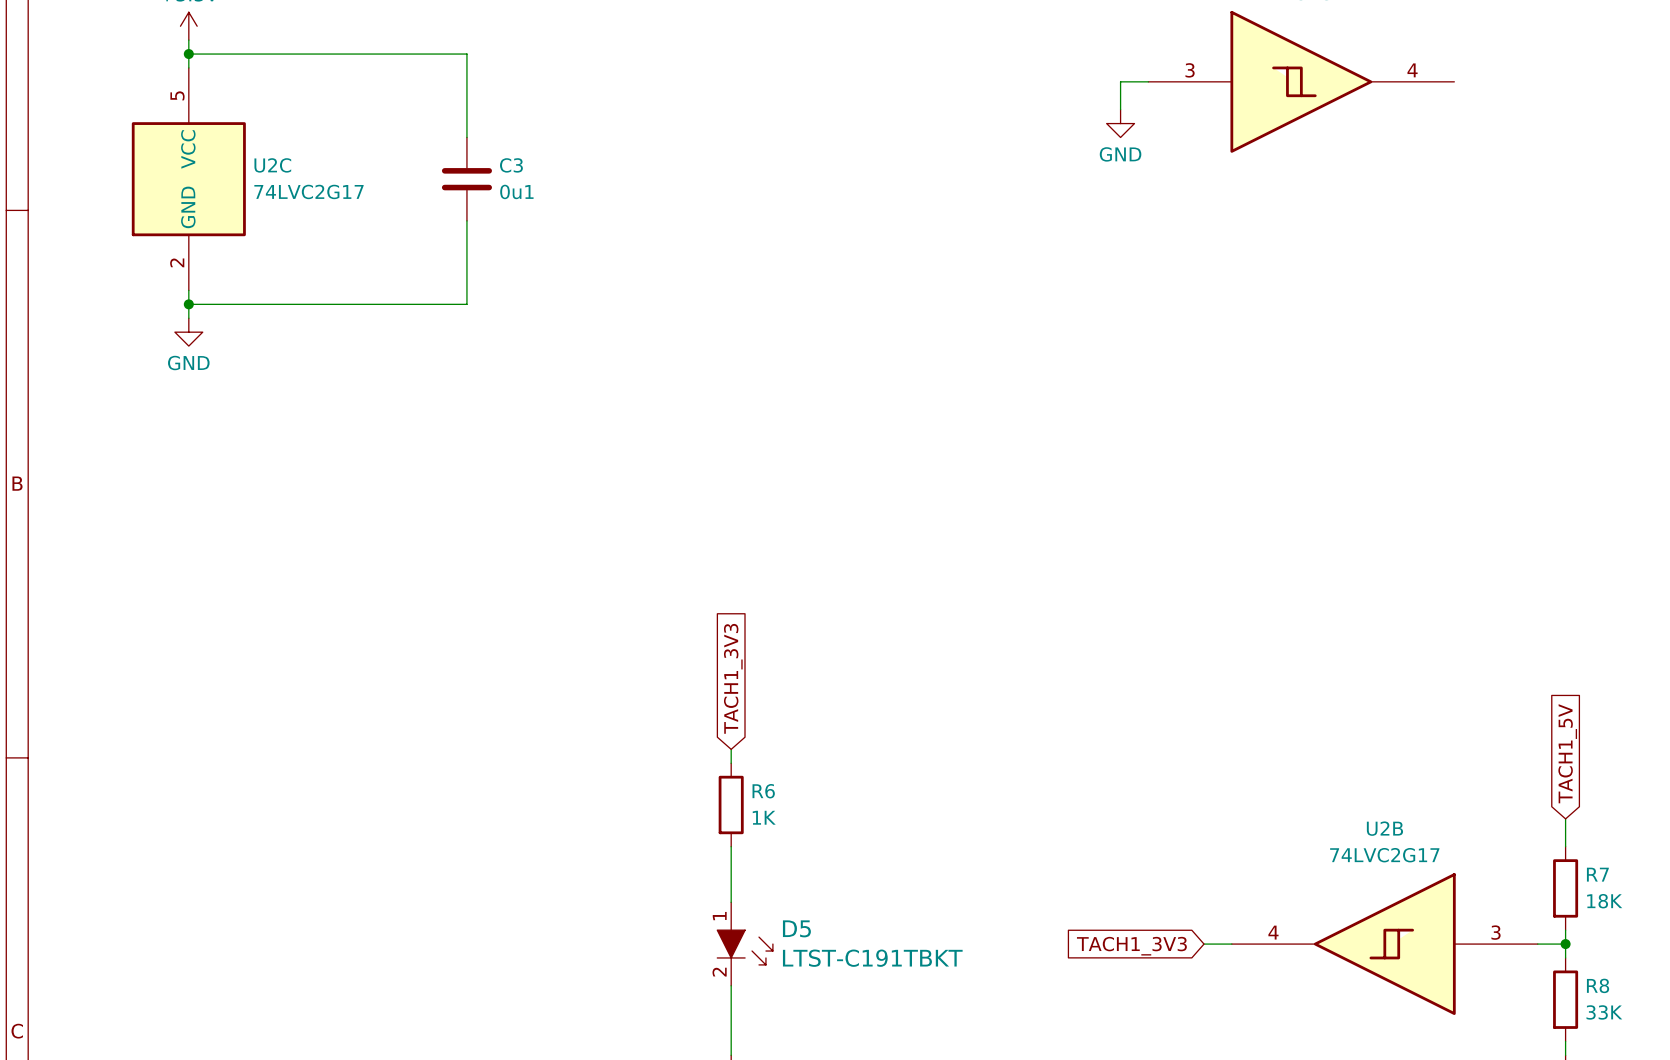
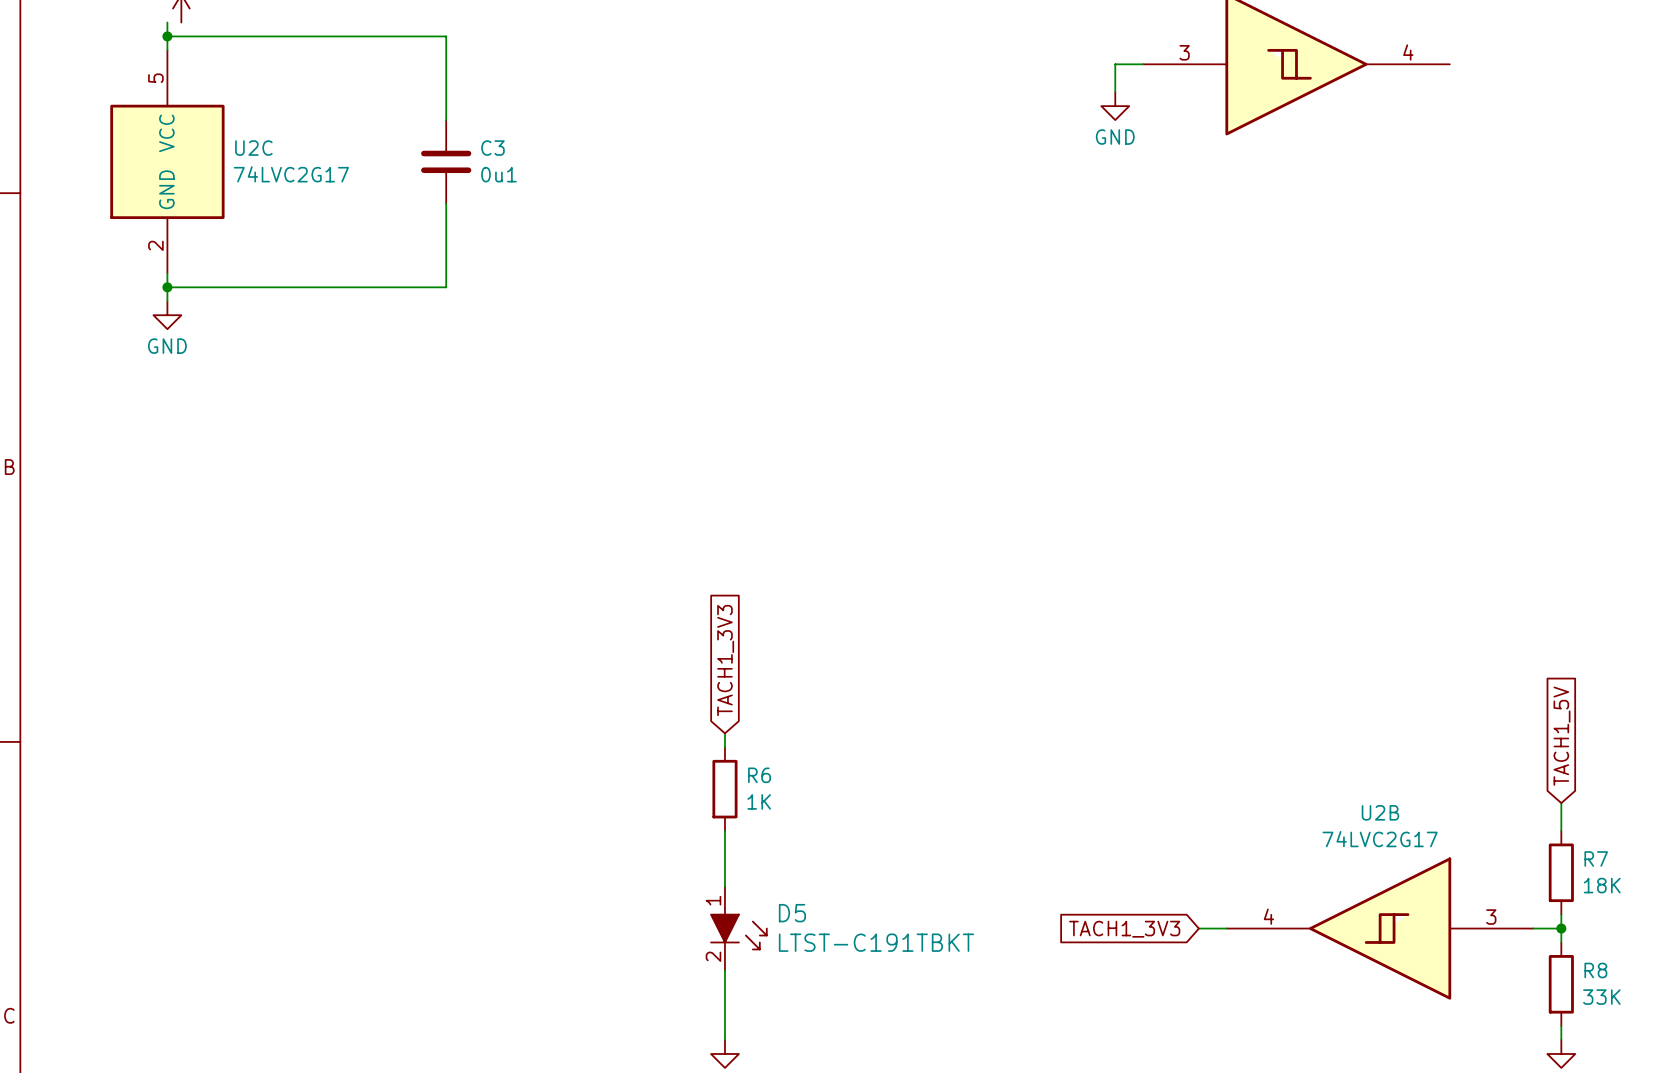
wire: (188, 40) (188, 67) -> (167, 22) (167, 50)
wire: none -> (167, 36) (181, 36)
junction position: (188, 54) -> (167, 36)
wire: (453, 54) (466, 54) (466, 137) -> (446, 36) (446, 120)
U2C position: (188, 179) -> (167, 161)
C3 position: (466, 179) -> (446, 161)
wire: (466, 220) (466, 304) (453, 304) -> (446, 203) (446, 287)
wire: (188, 290) (188, 318) -> (167, 273) (167, 301)
wire: none -> (167, 287) (181, 287)
junction position: (188, 304) -> (167, 287)
power symbol position: GND (188, 332) -> GND (167, 315)

